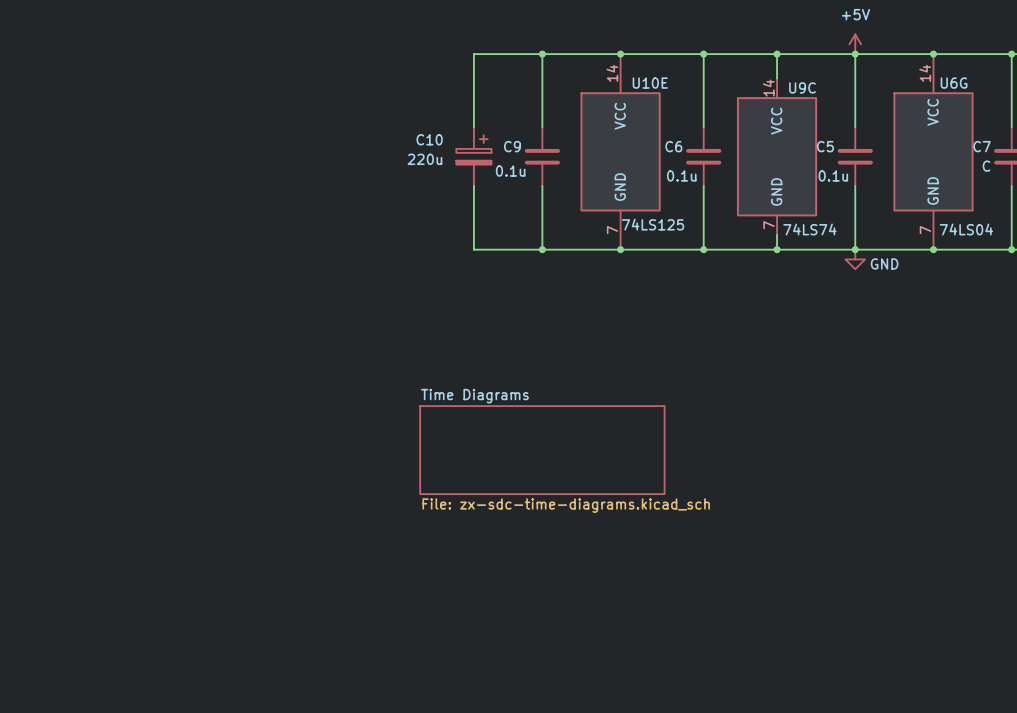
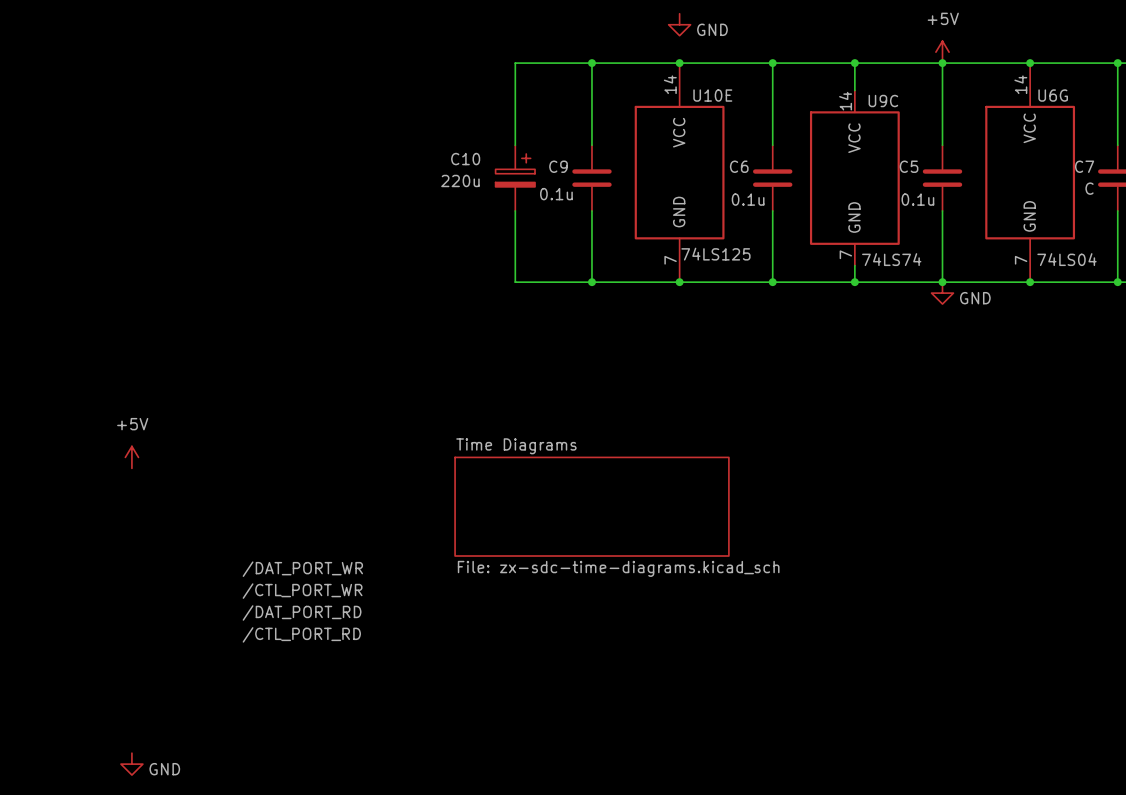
power symbol: none -> GND (679, 24)
power symbol: none -> +5V (131, 457)
label: none -> /DAT_PORT_WR (302, 569)
label: none -> /CTL_PORT_WR (302, 591)
label: none -> /DAT_PORT_RD (302, 612)
label: none -> /CTL_PORT_RD (301, 634)
power symbol: none -> GND (131, 764)

